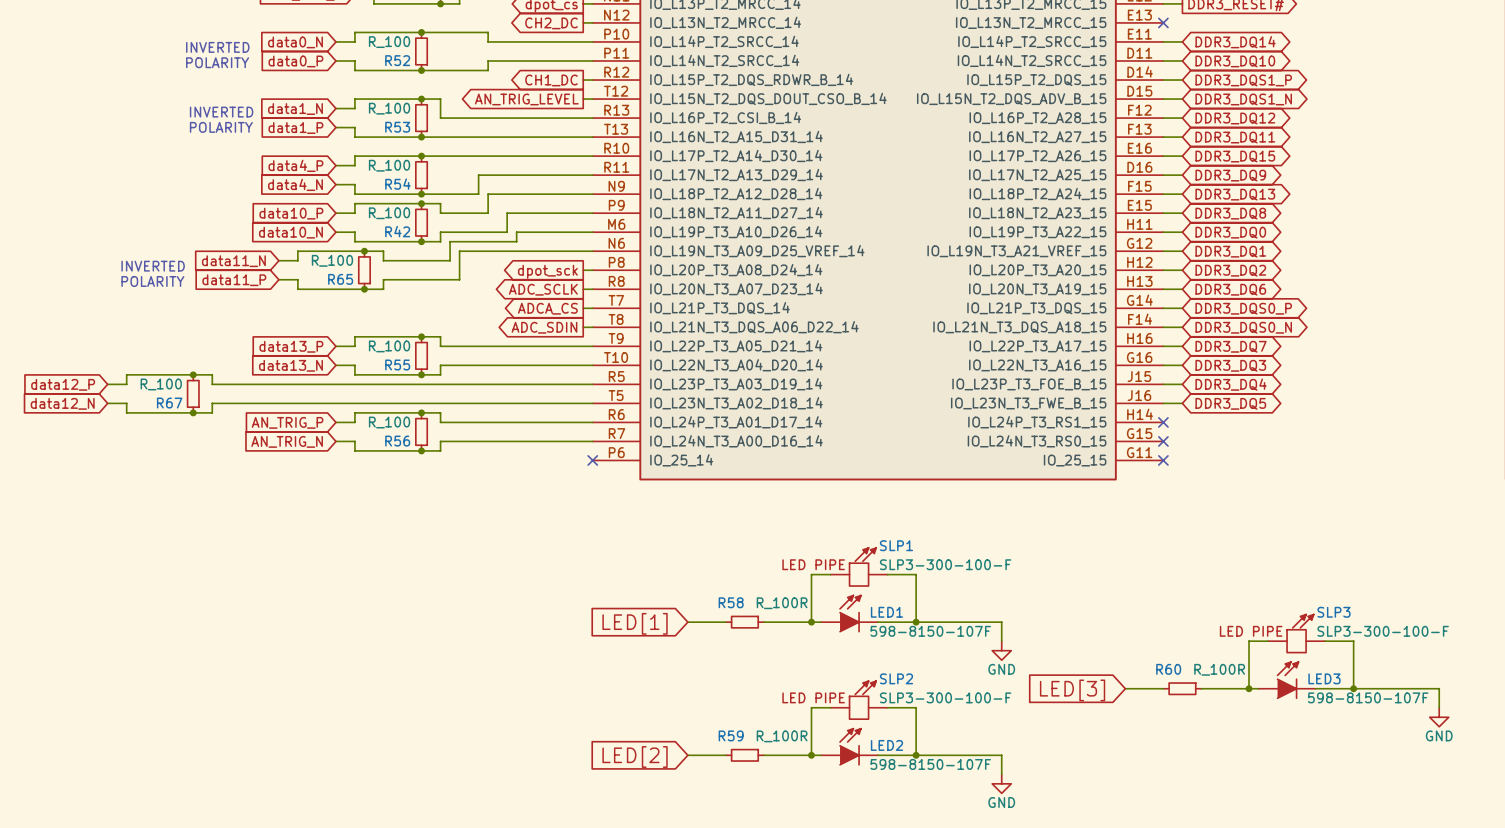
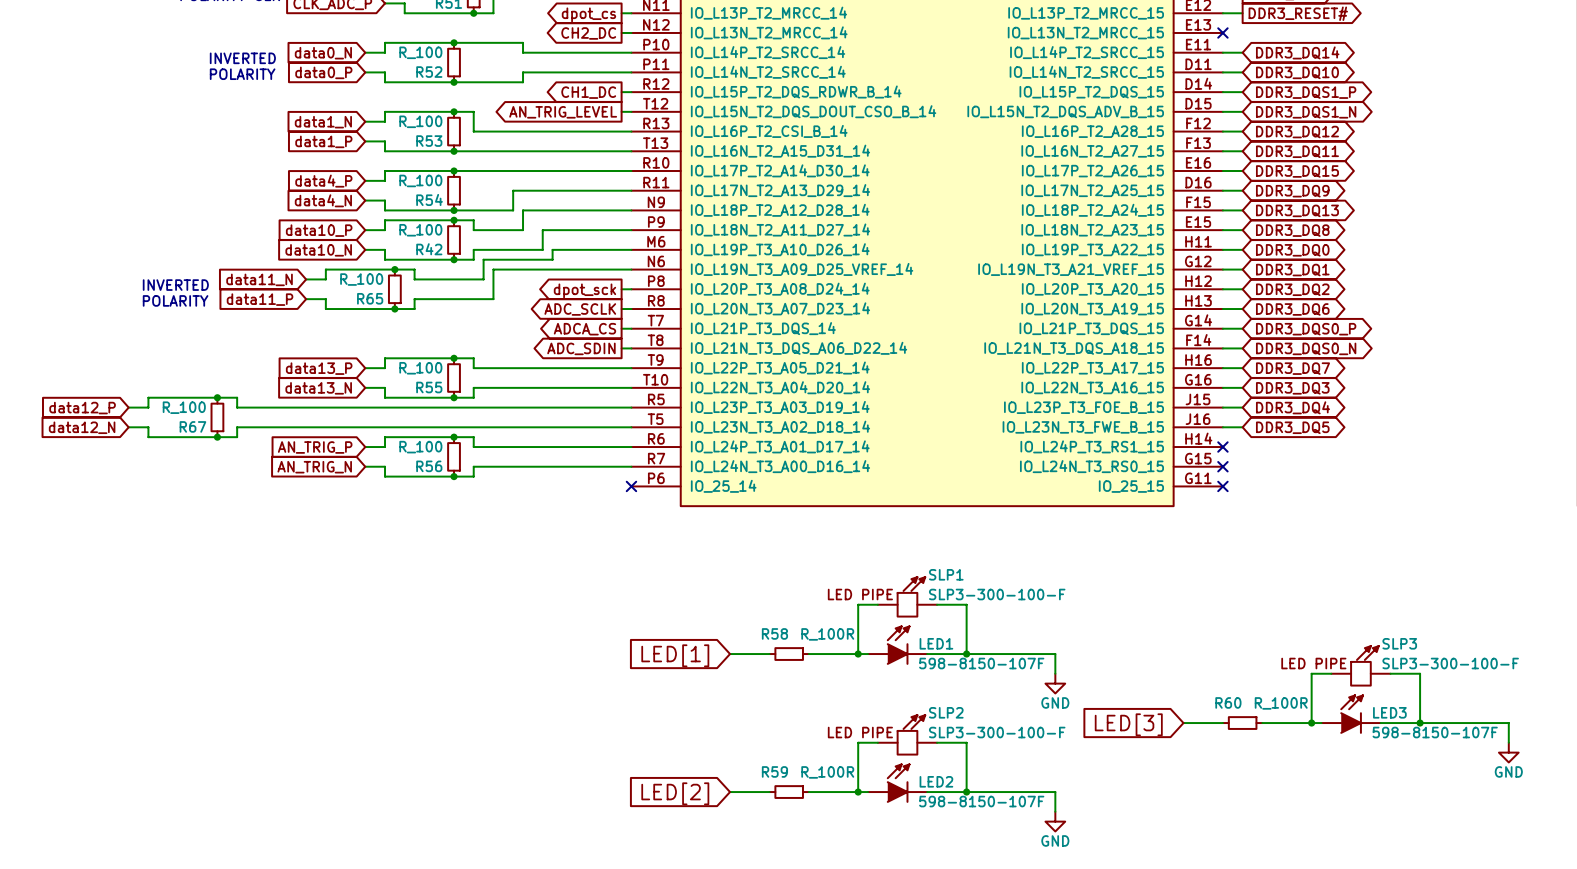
text: INVERTED (221, 112) -> none
text: POLARITY (221, 127) -> none

